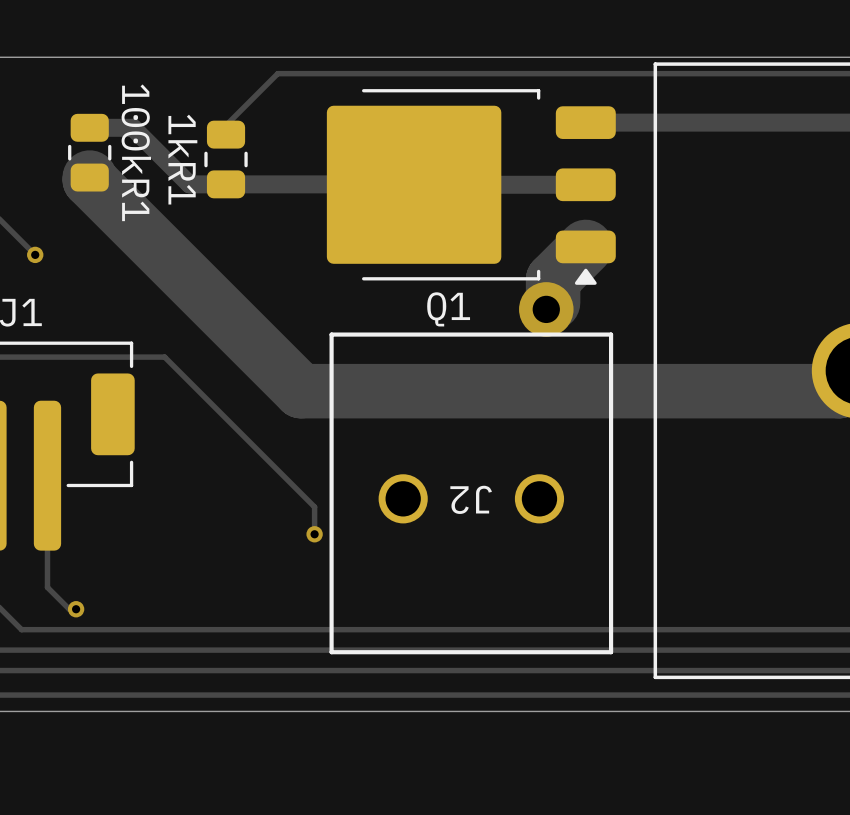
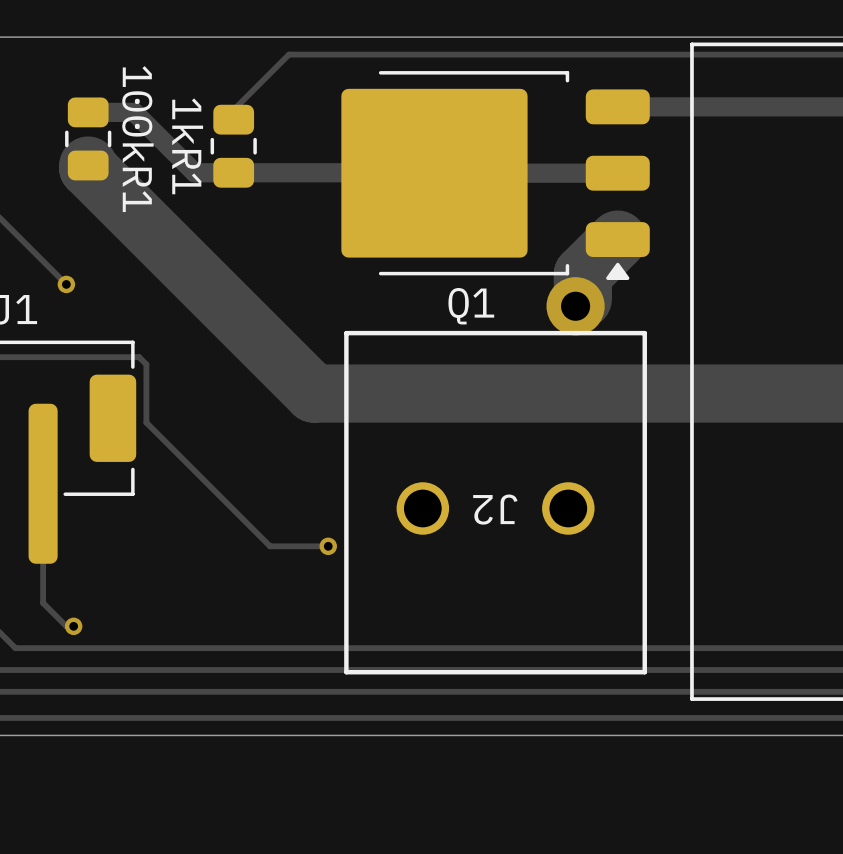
track: none -> (30, 248) (66, 284)
via position: (35, 254) -> (66, 284)
track: (137, 357) (164, 357) (314, 507) (314, 534) -> (139, 357) (146, 364) (146, 422) (270, 546) (328, 546)

